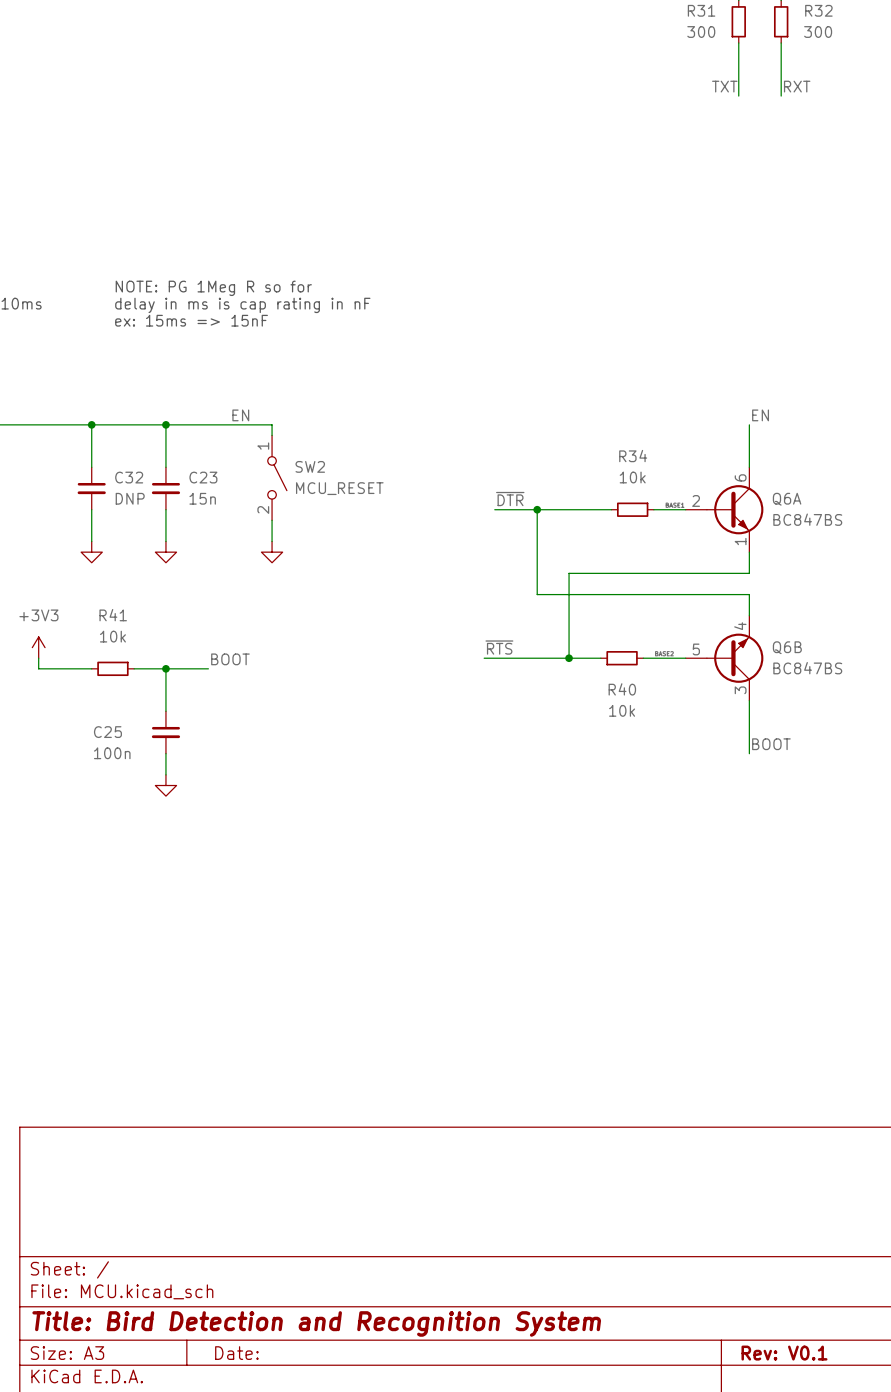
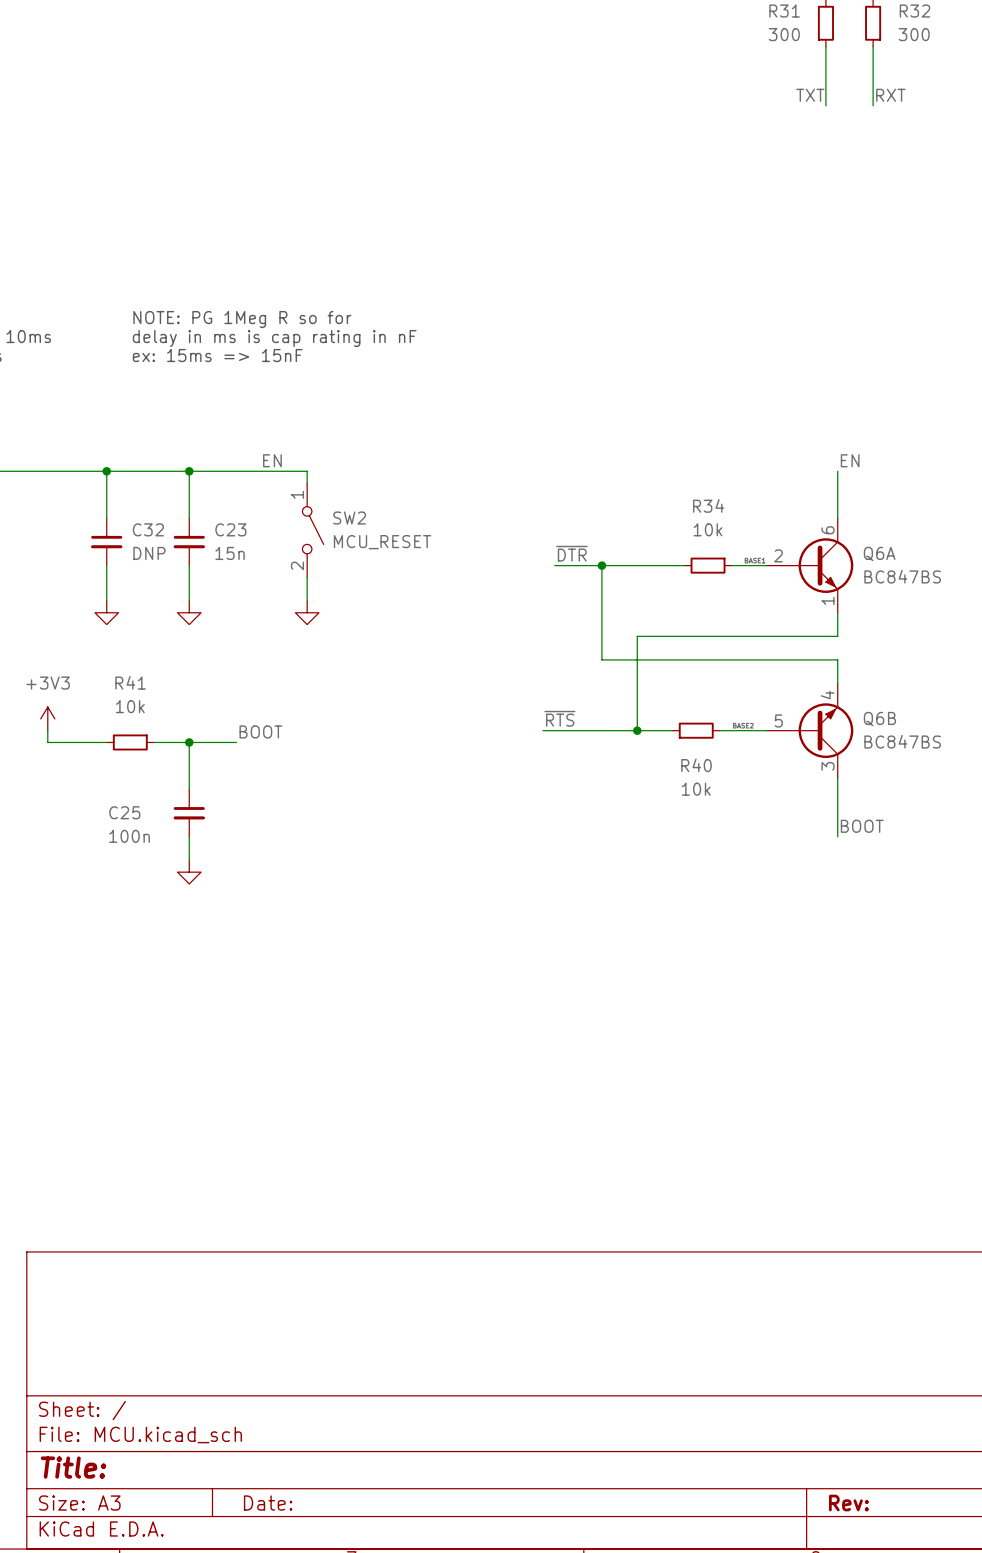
title block: Title: Bird Detection and Recognition System (316, 1323) -> Title: (73, 1467)
title block: Rev: V0.1 (784, 1353) -> Rev: (848, 1503)

